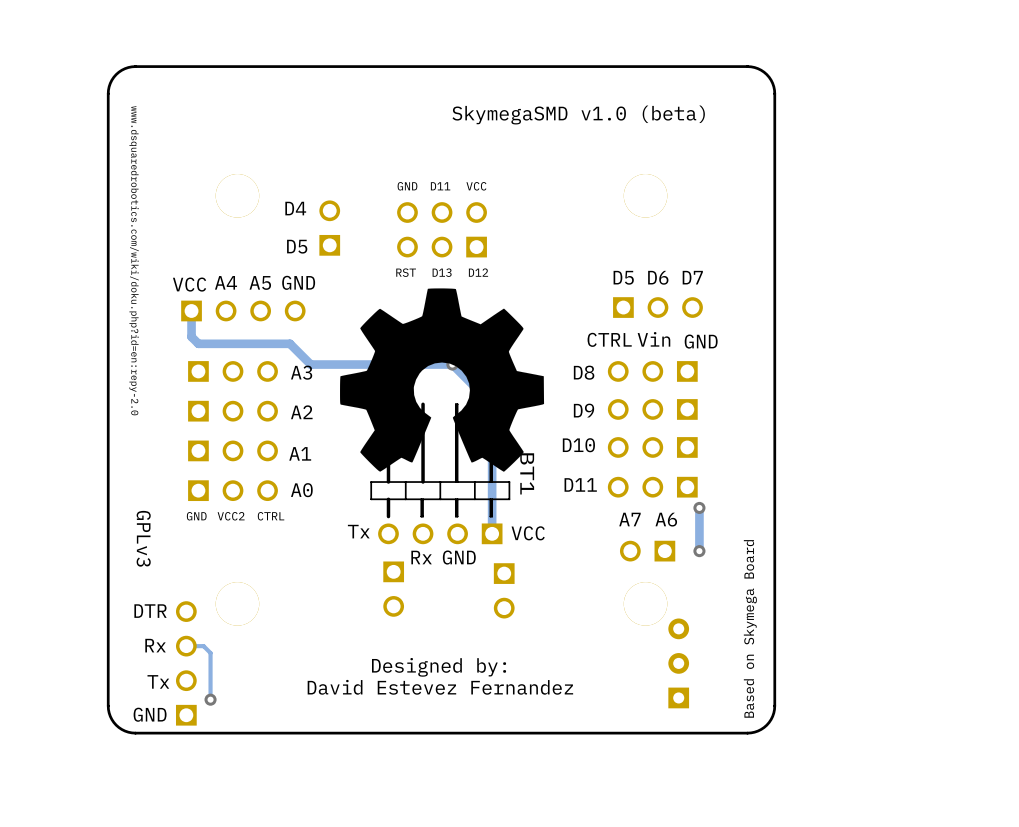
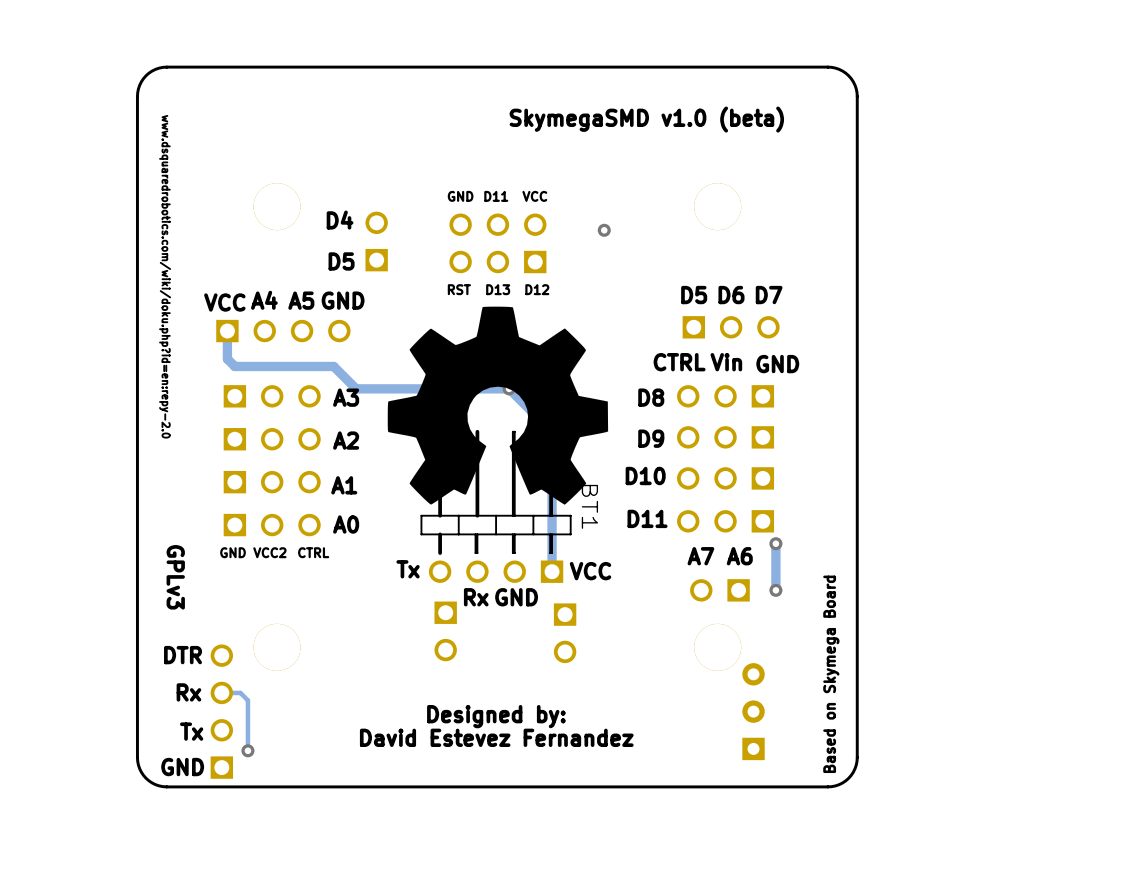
via: none -> (604, 230)

